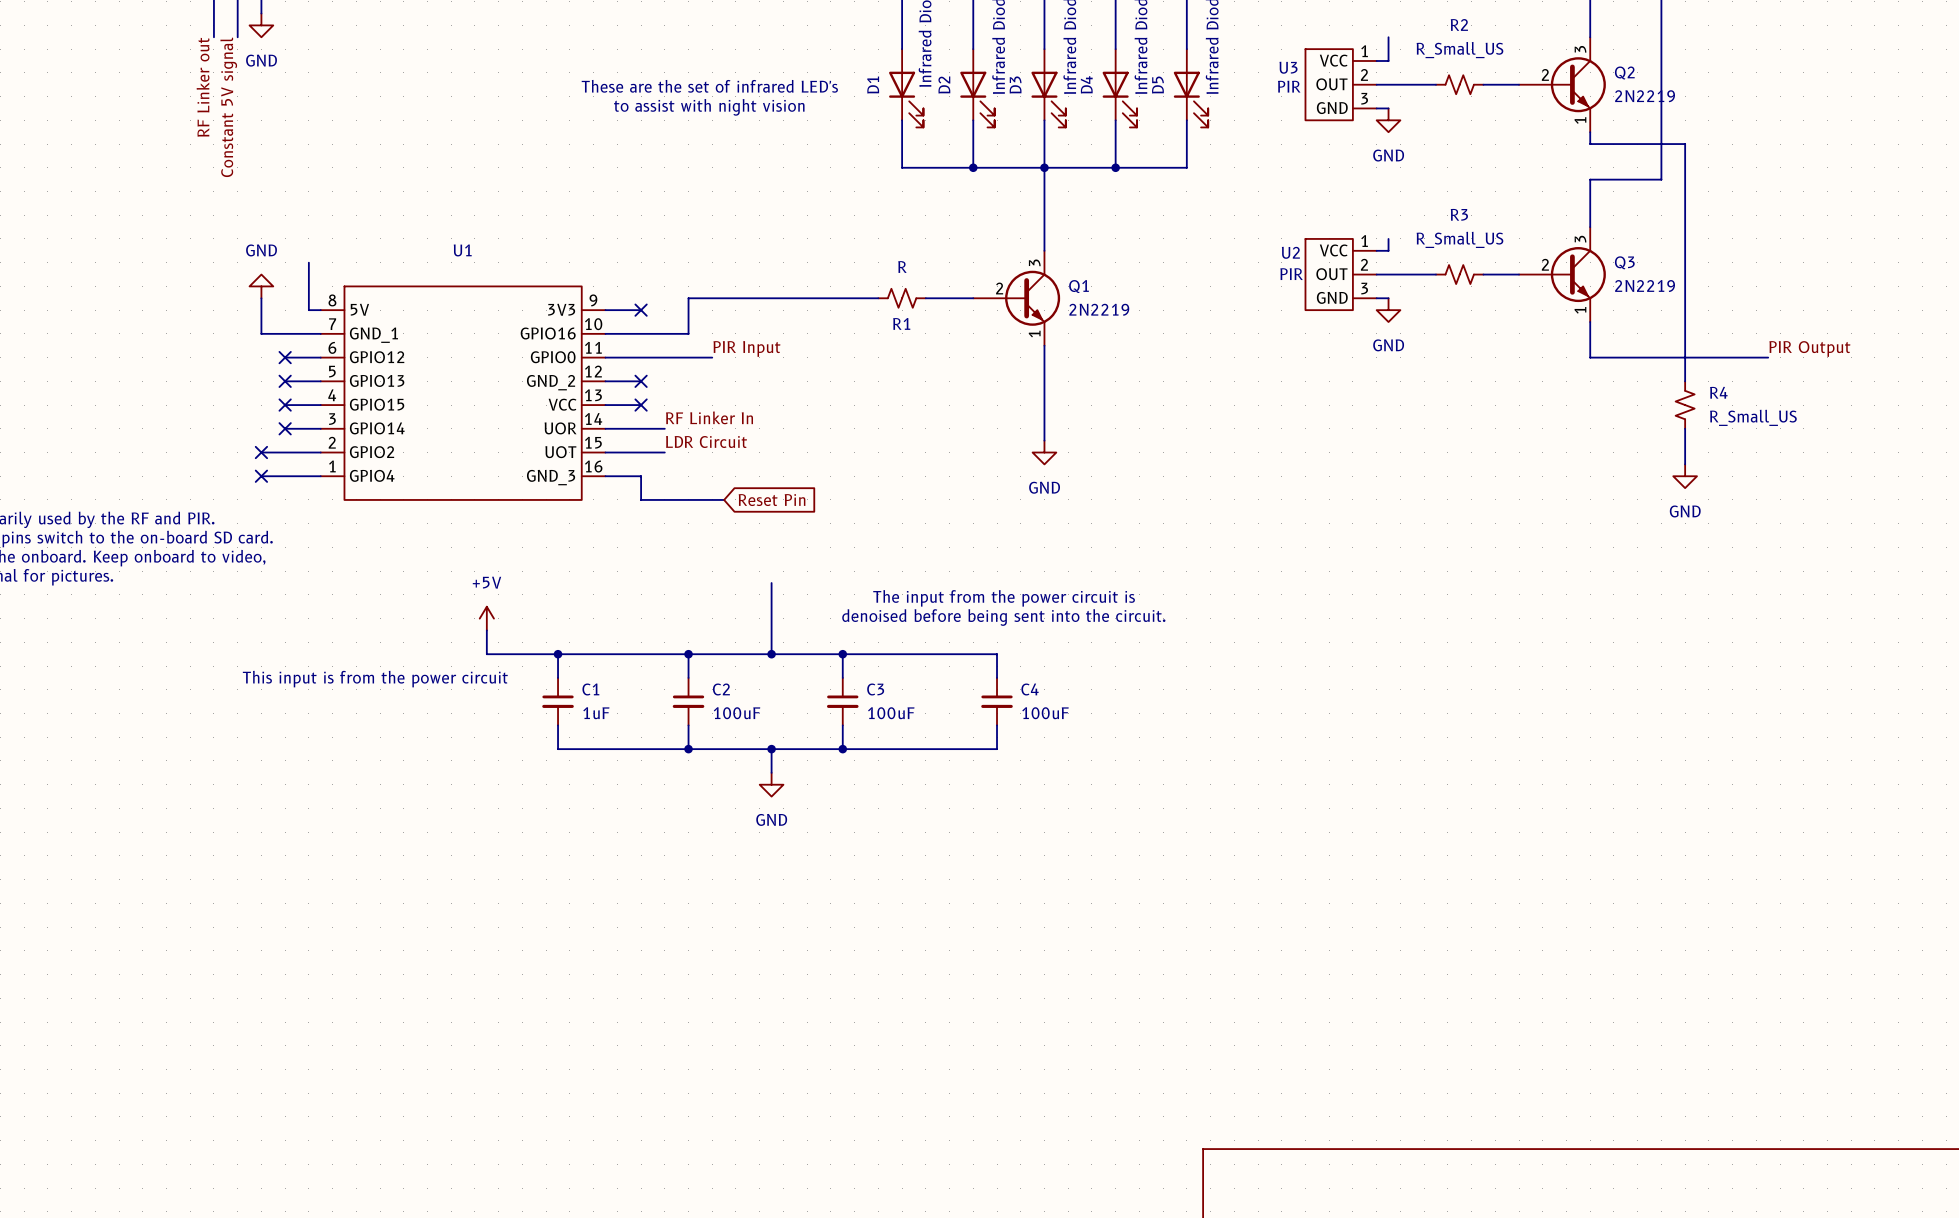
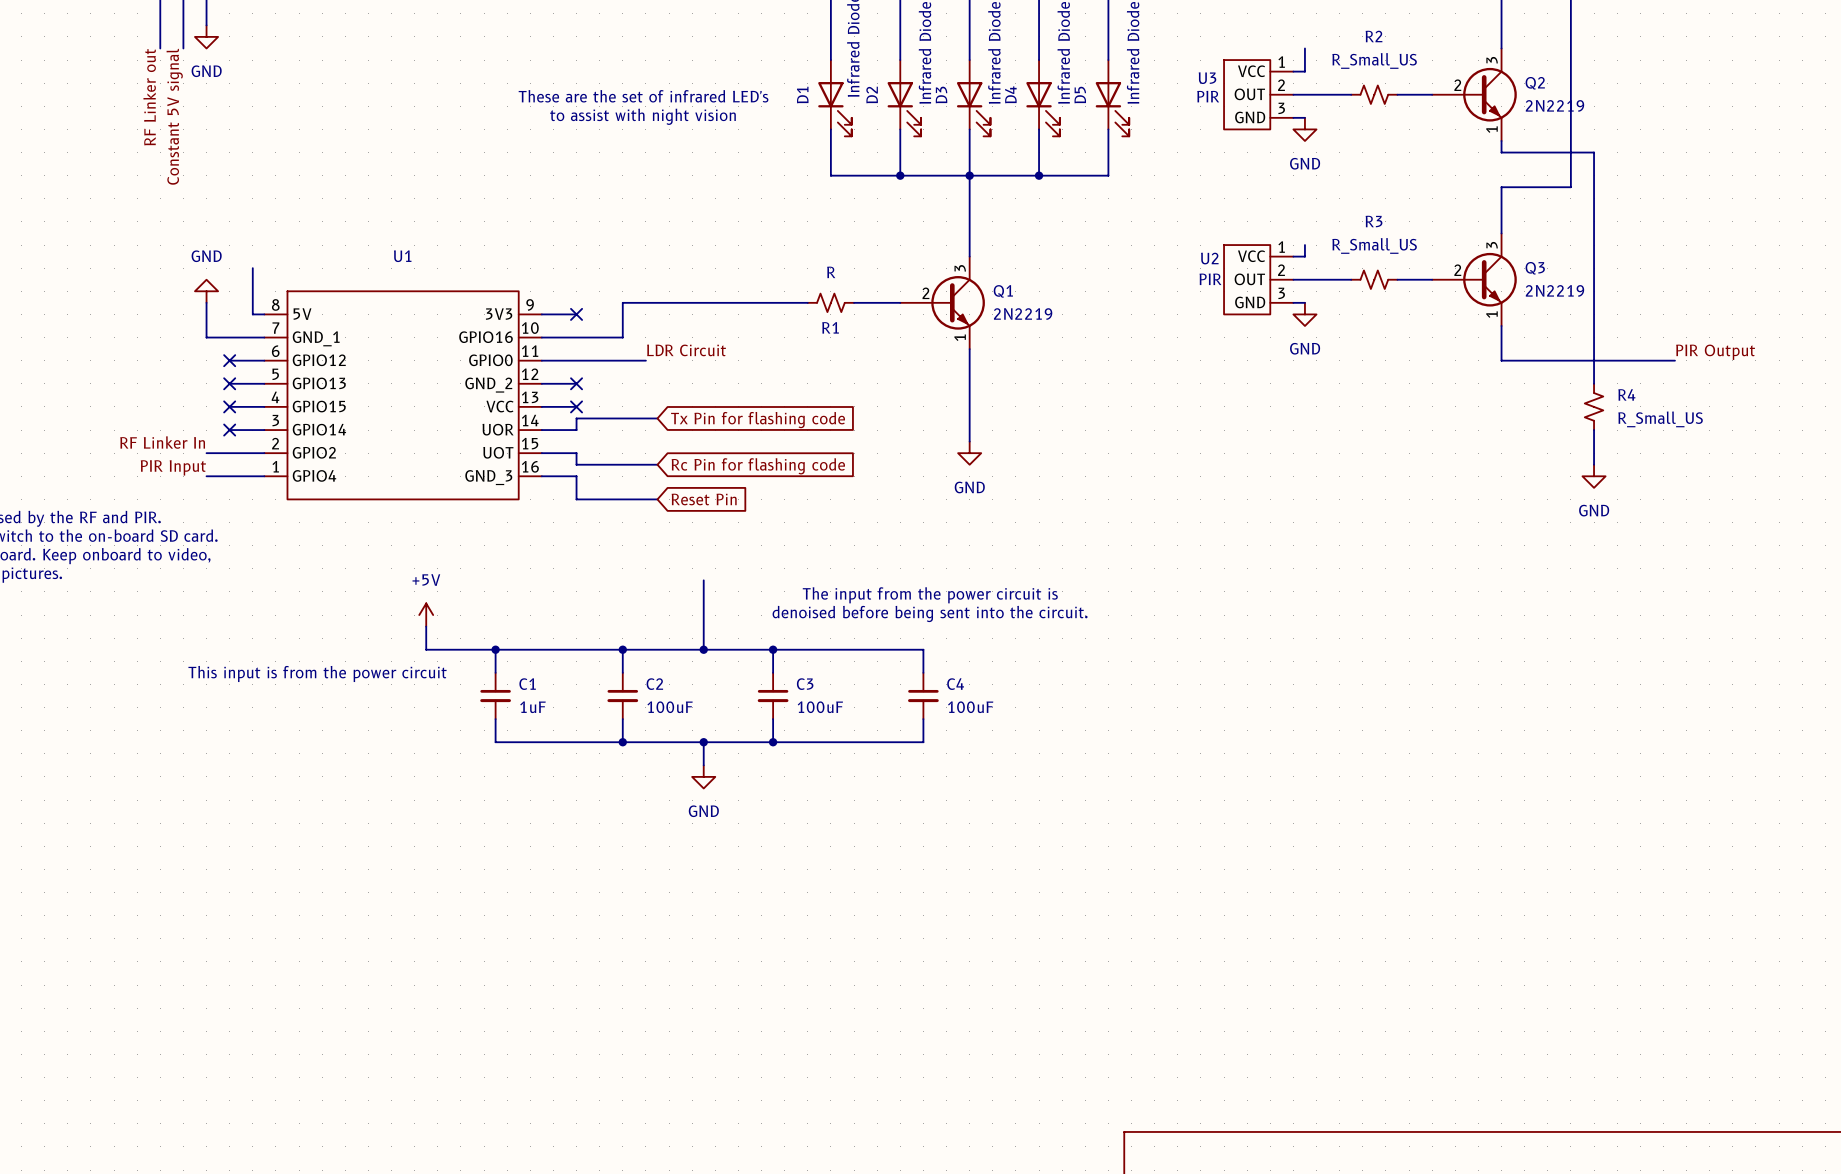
label: PIR Input (746, 348) -> LDR Circuit (686, 350)
label: RF Linker In (709, 417) -> none
global label: none -> Tx Pin for flashing code (758, 420)
wire: (641, 428) (664, 428) -> (576, 430) (576, 418) (657, 418)
label: none -> RF Linker In (162, 442)
label: LDR Circuit (706, 441) -> none
no-connect mark: (261, 452) -> none
wire: (641, 452) (664, 452) -> (576, 453) (576, 464) (657, 464)
global label: none -> Rc Pin for flashing code (758, 466)
label: none -> PIR Input (173, 467)
no-connect mark: (261, 476) -> none

